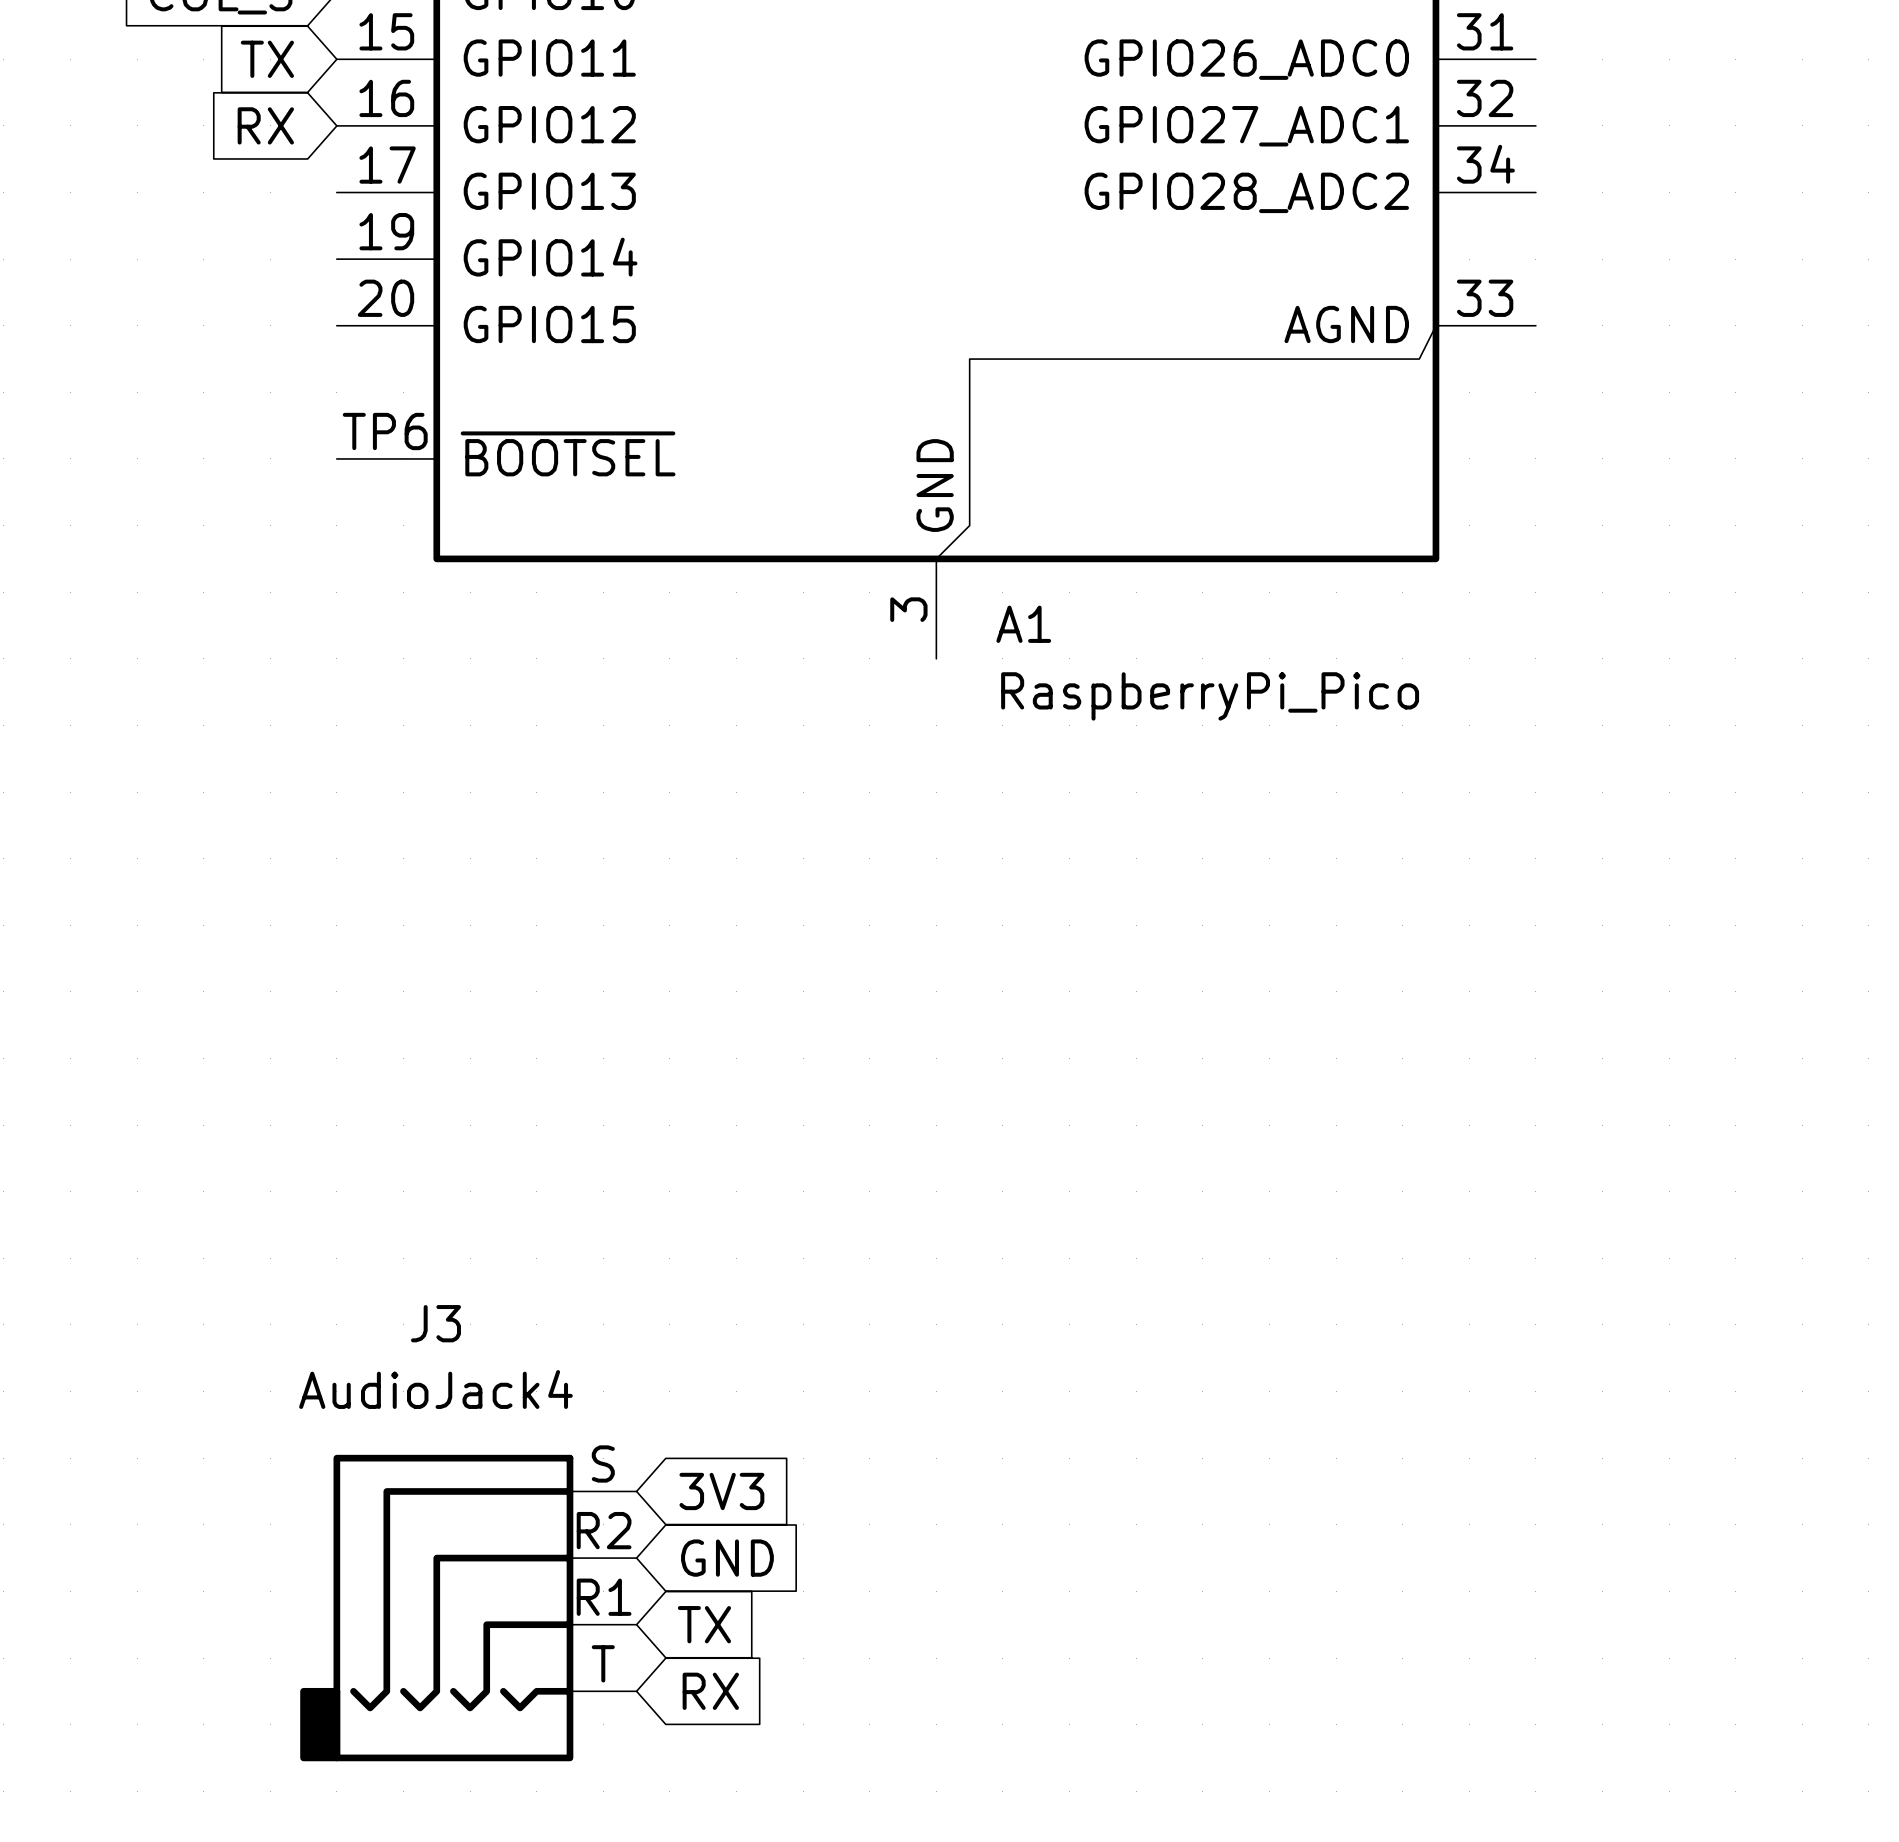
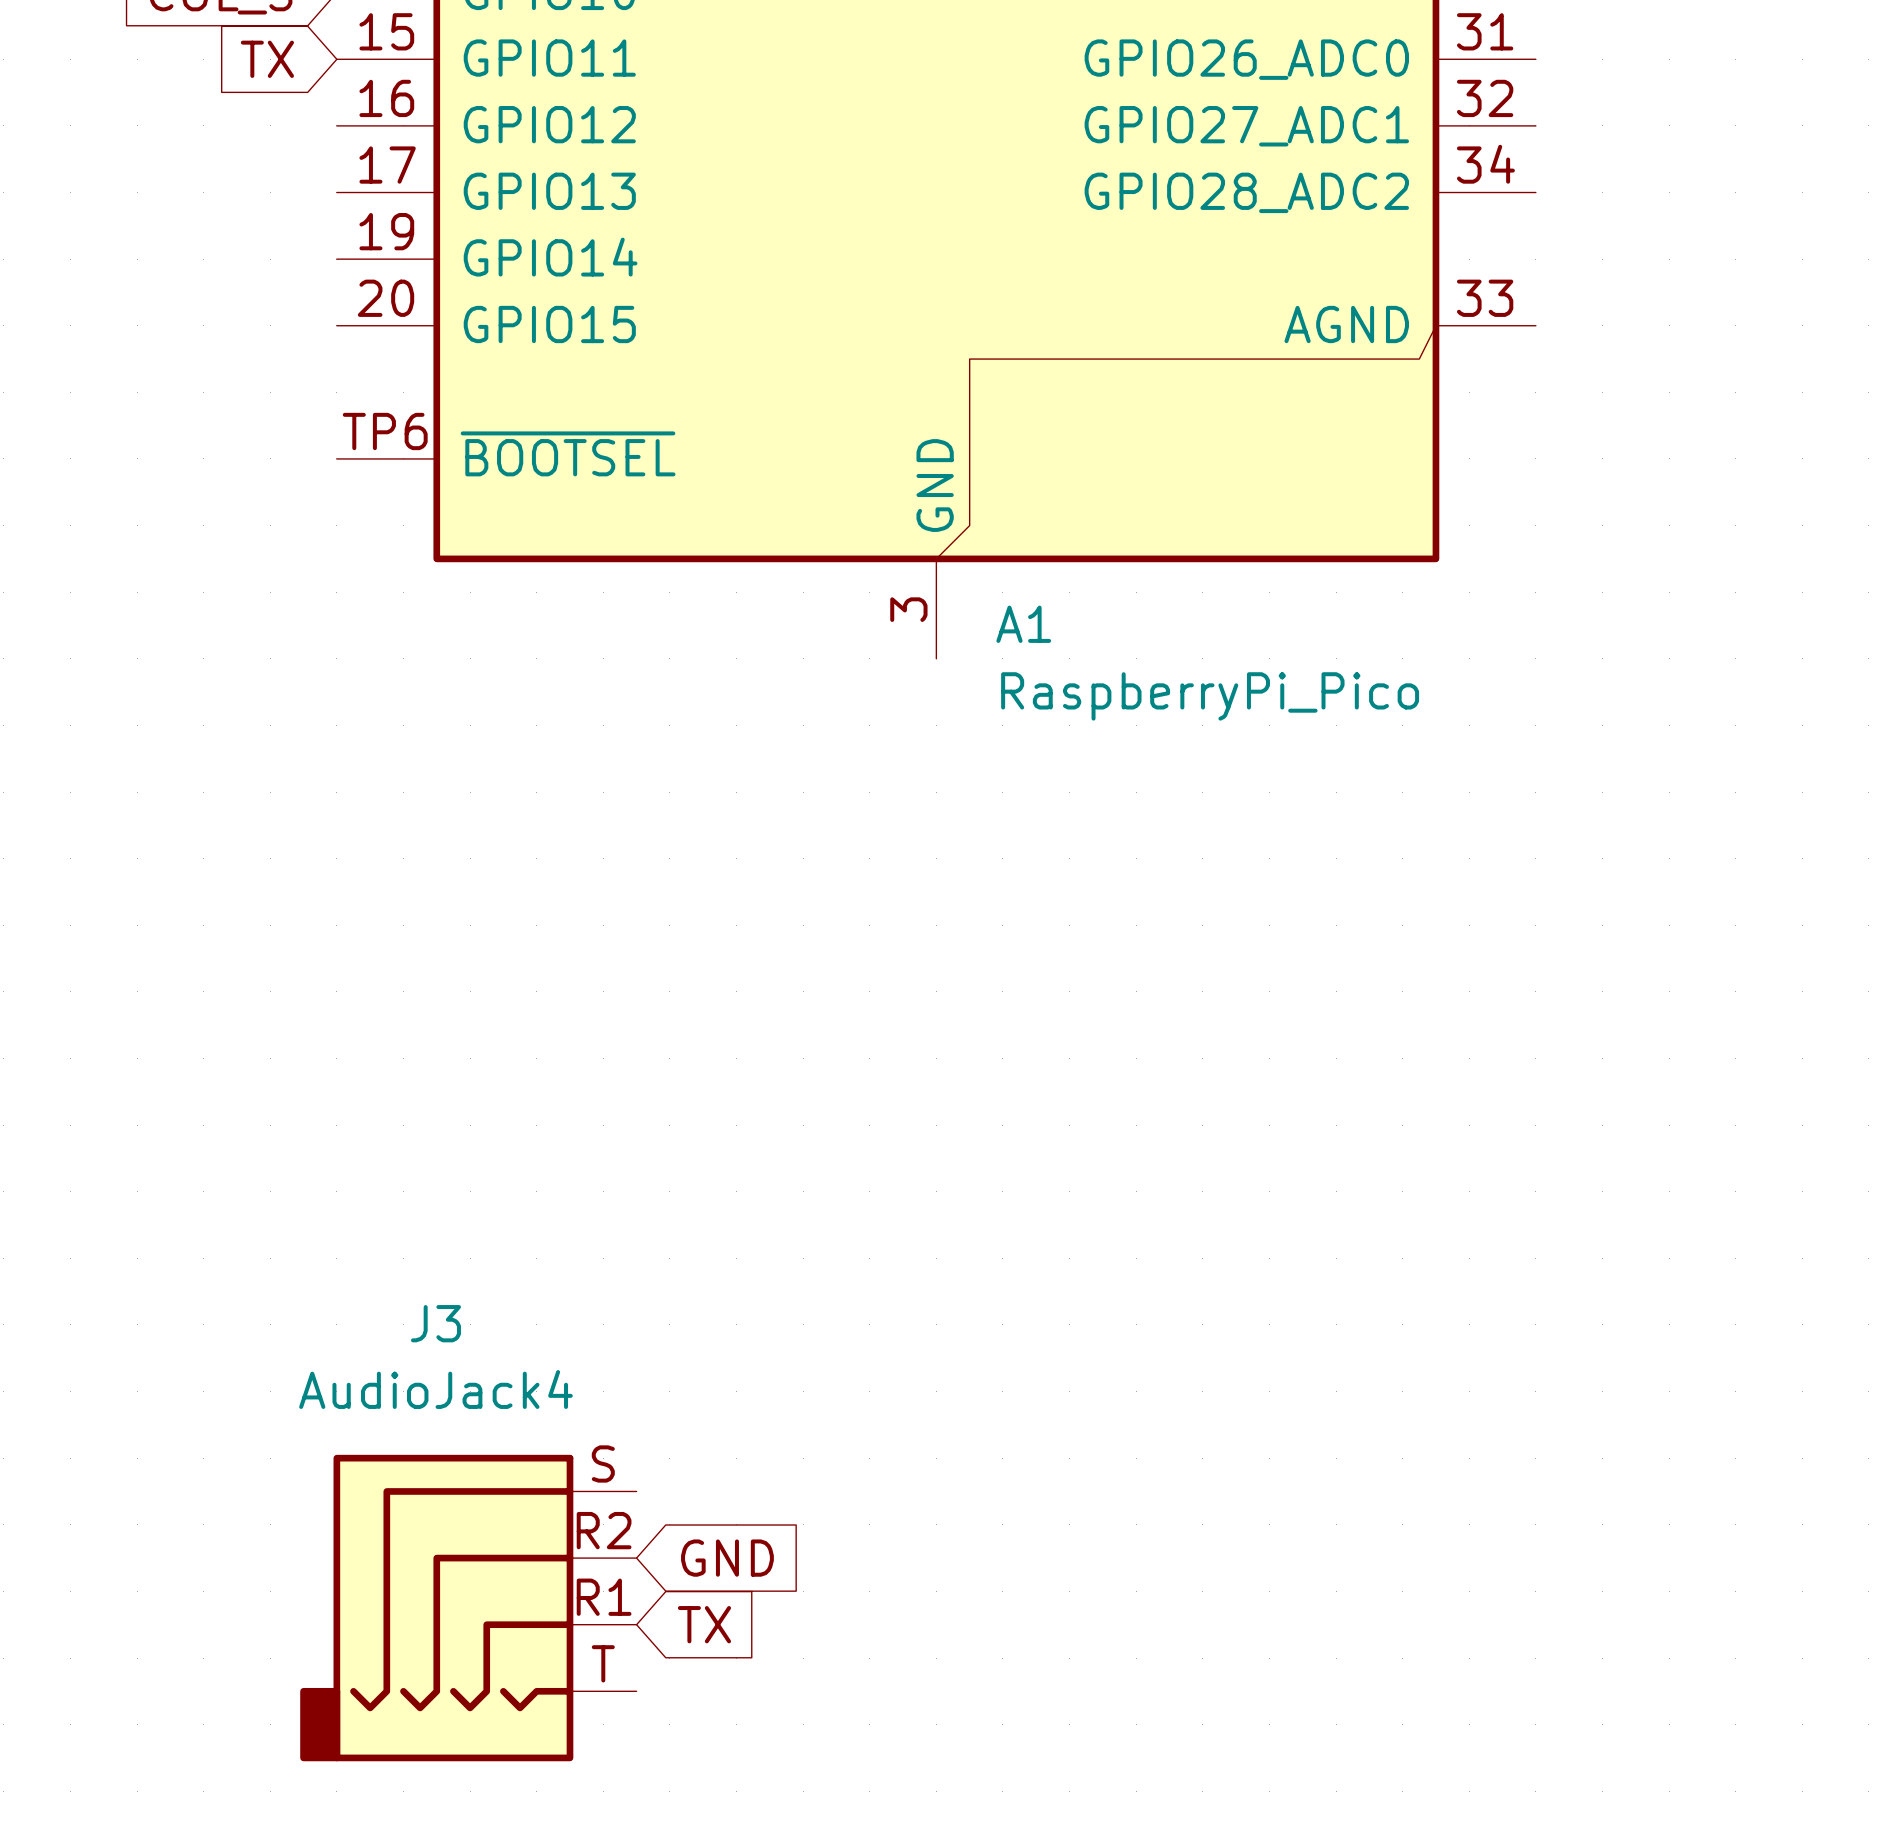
global label: RX (265, 125) -> none
global label: 3V3 (721, 1491) -> none
global label: RX (710, 1691) -> none

